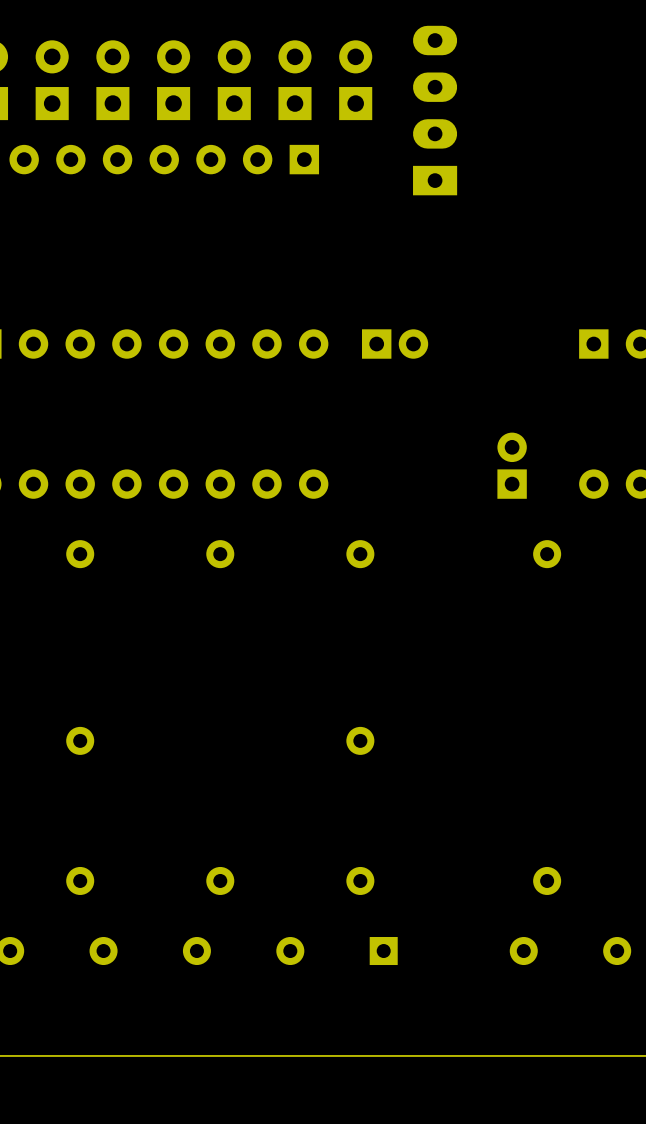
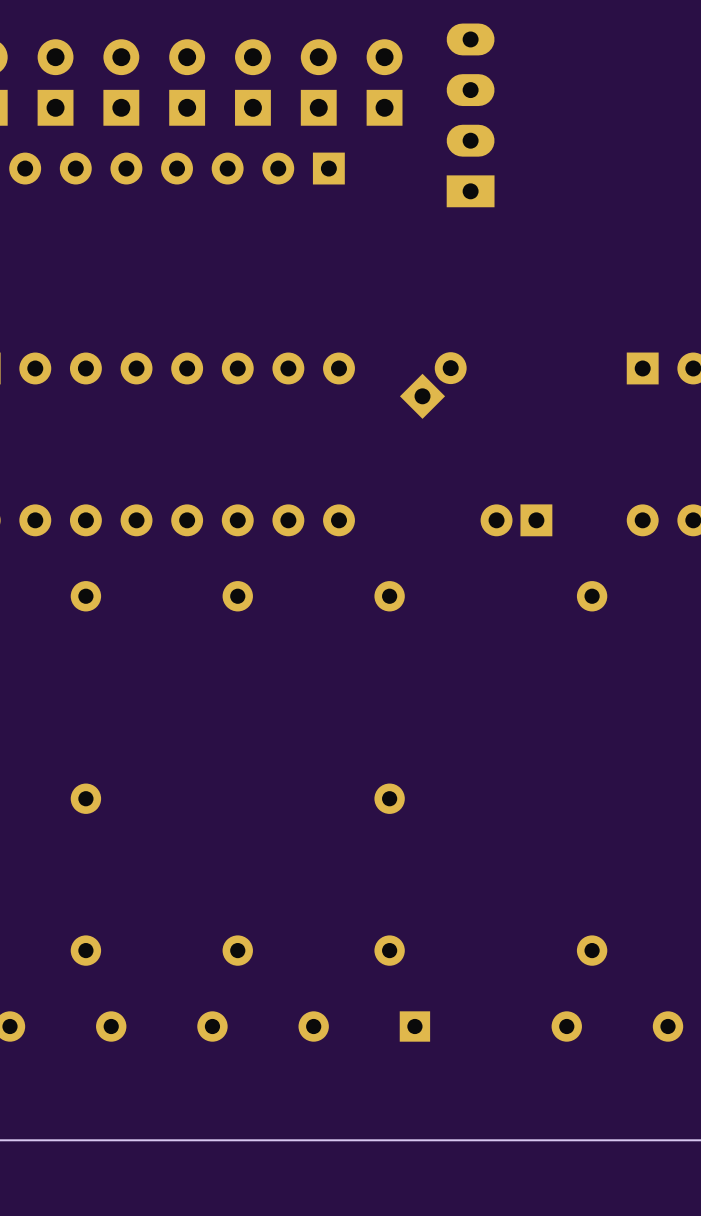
part rotation: 0° (395, 344) -> 45° counterclockwise (433, 385)
part rotation: 0° (512, 465) -> 90° counterclockwise (516, 520)

